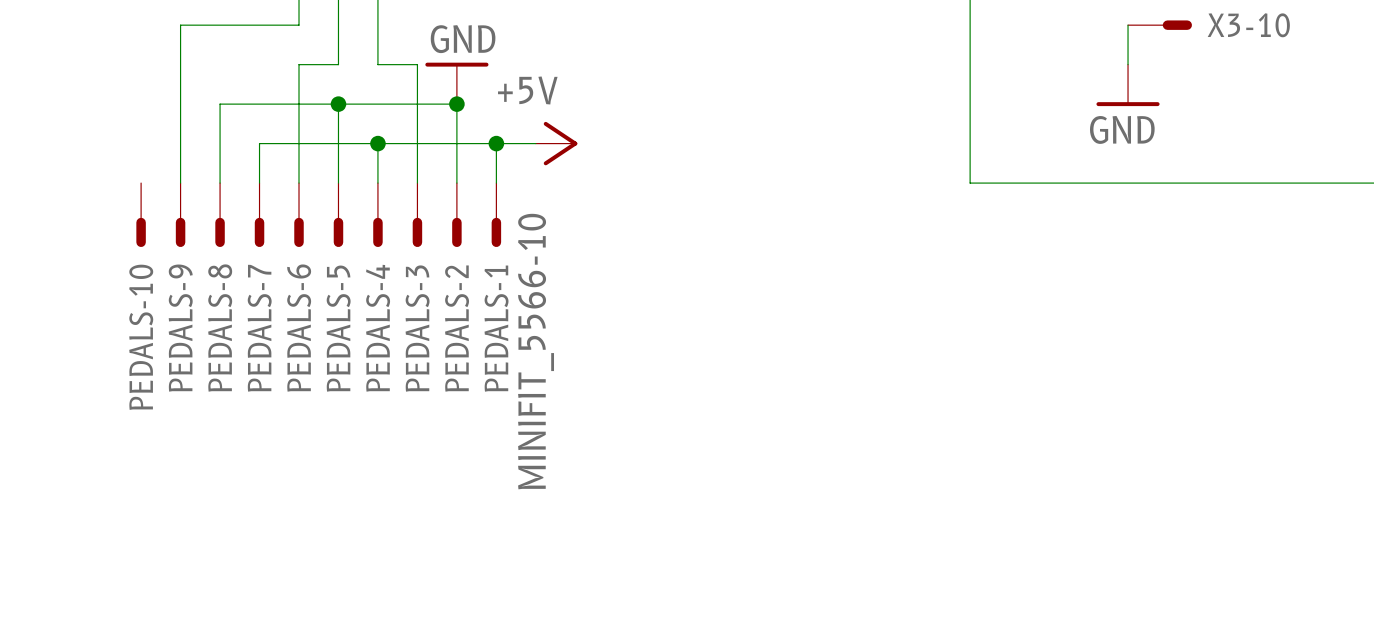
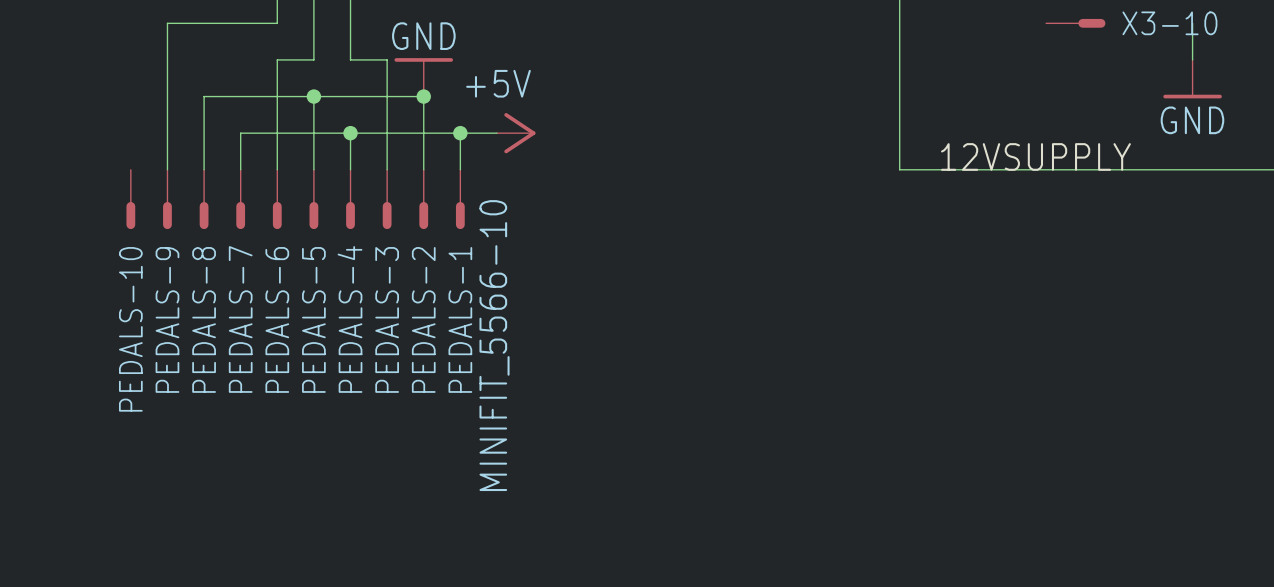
wire: (1128, 25) (1128, 64) -> (1192, 23) (1192, 59)
power symbol position: GND (1128, 85) -> GND (1192, 79)
label: none -> 12VSUPPLY (1035, 156)

